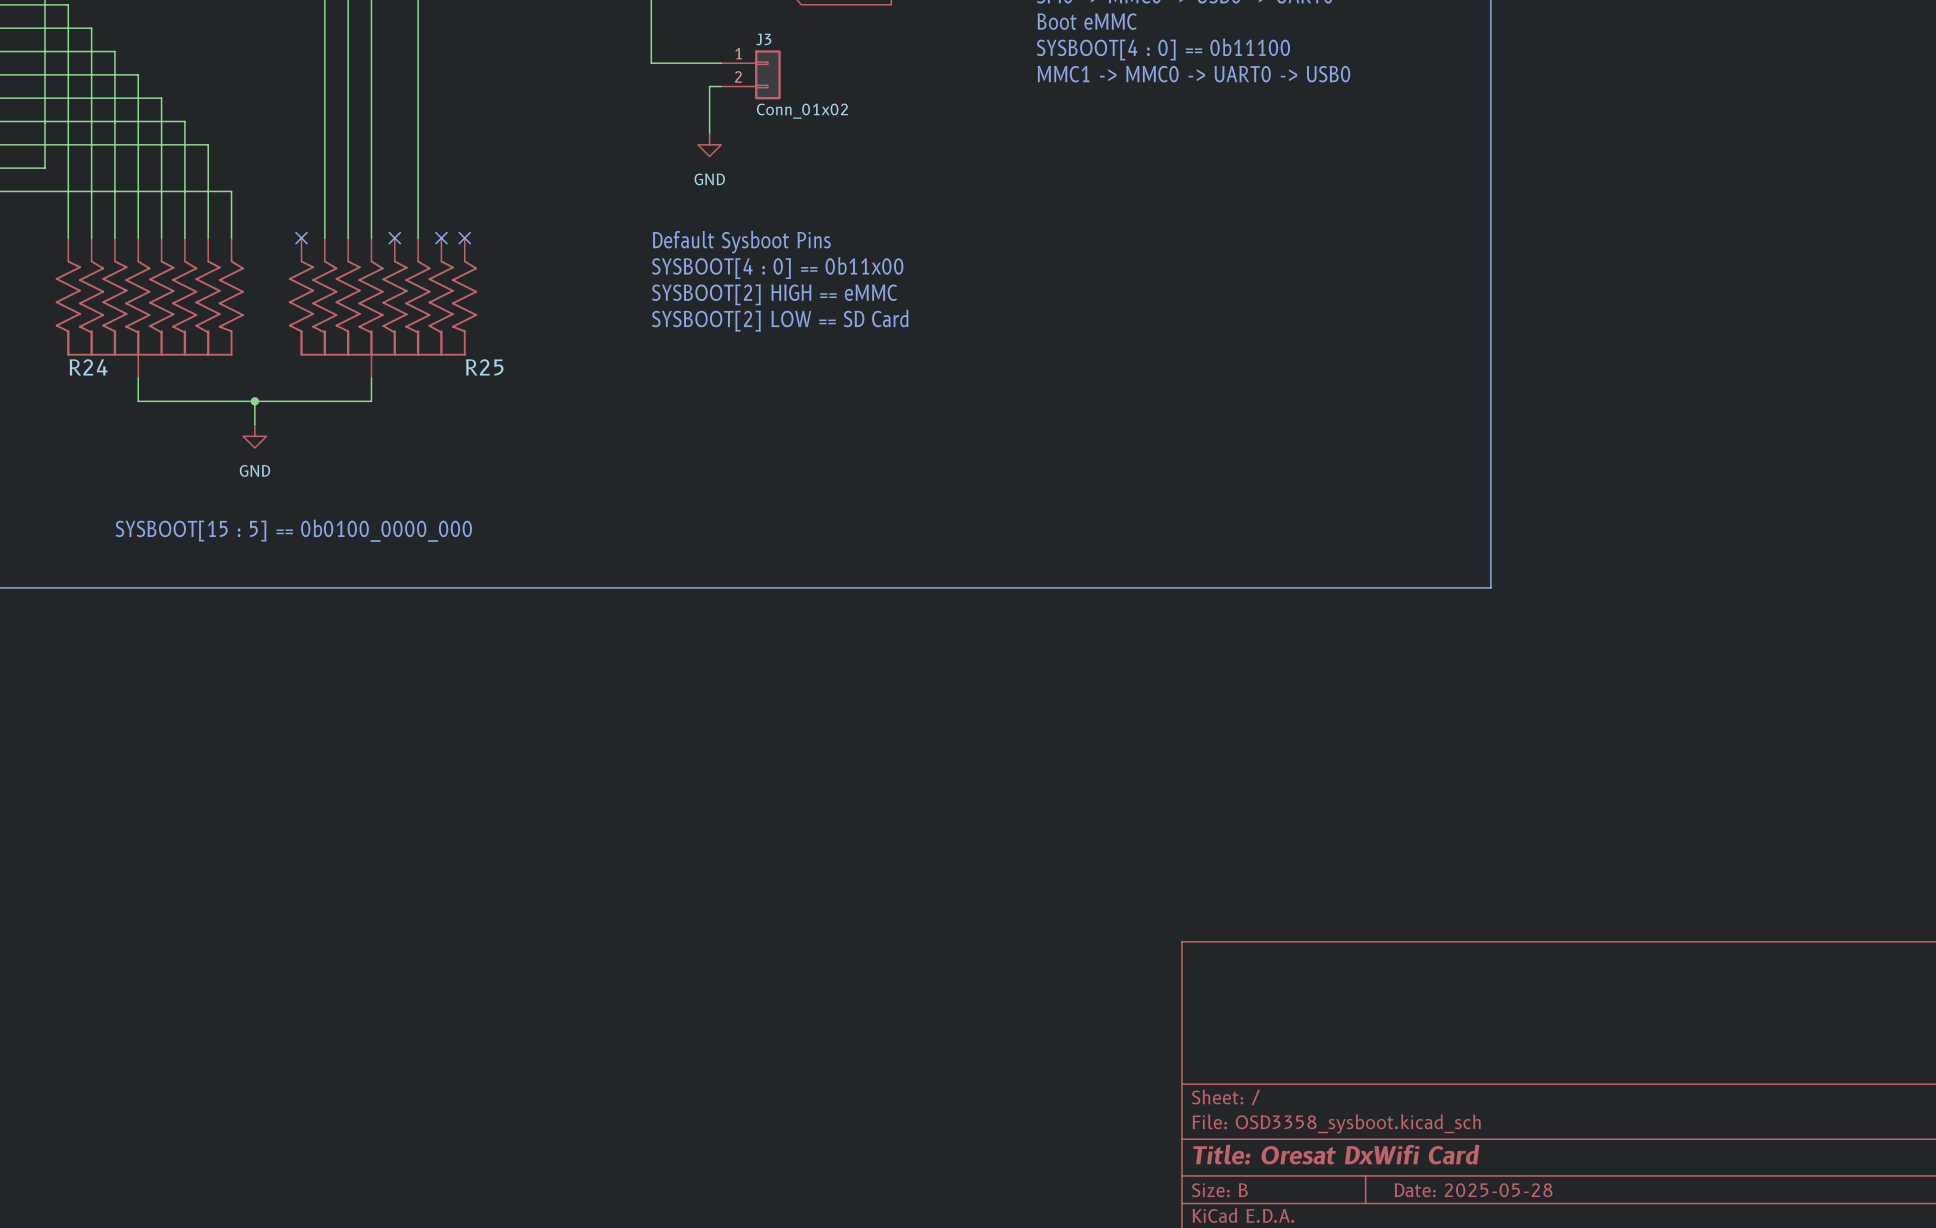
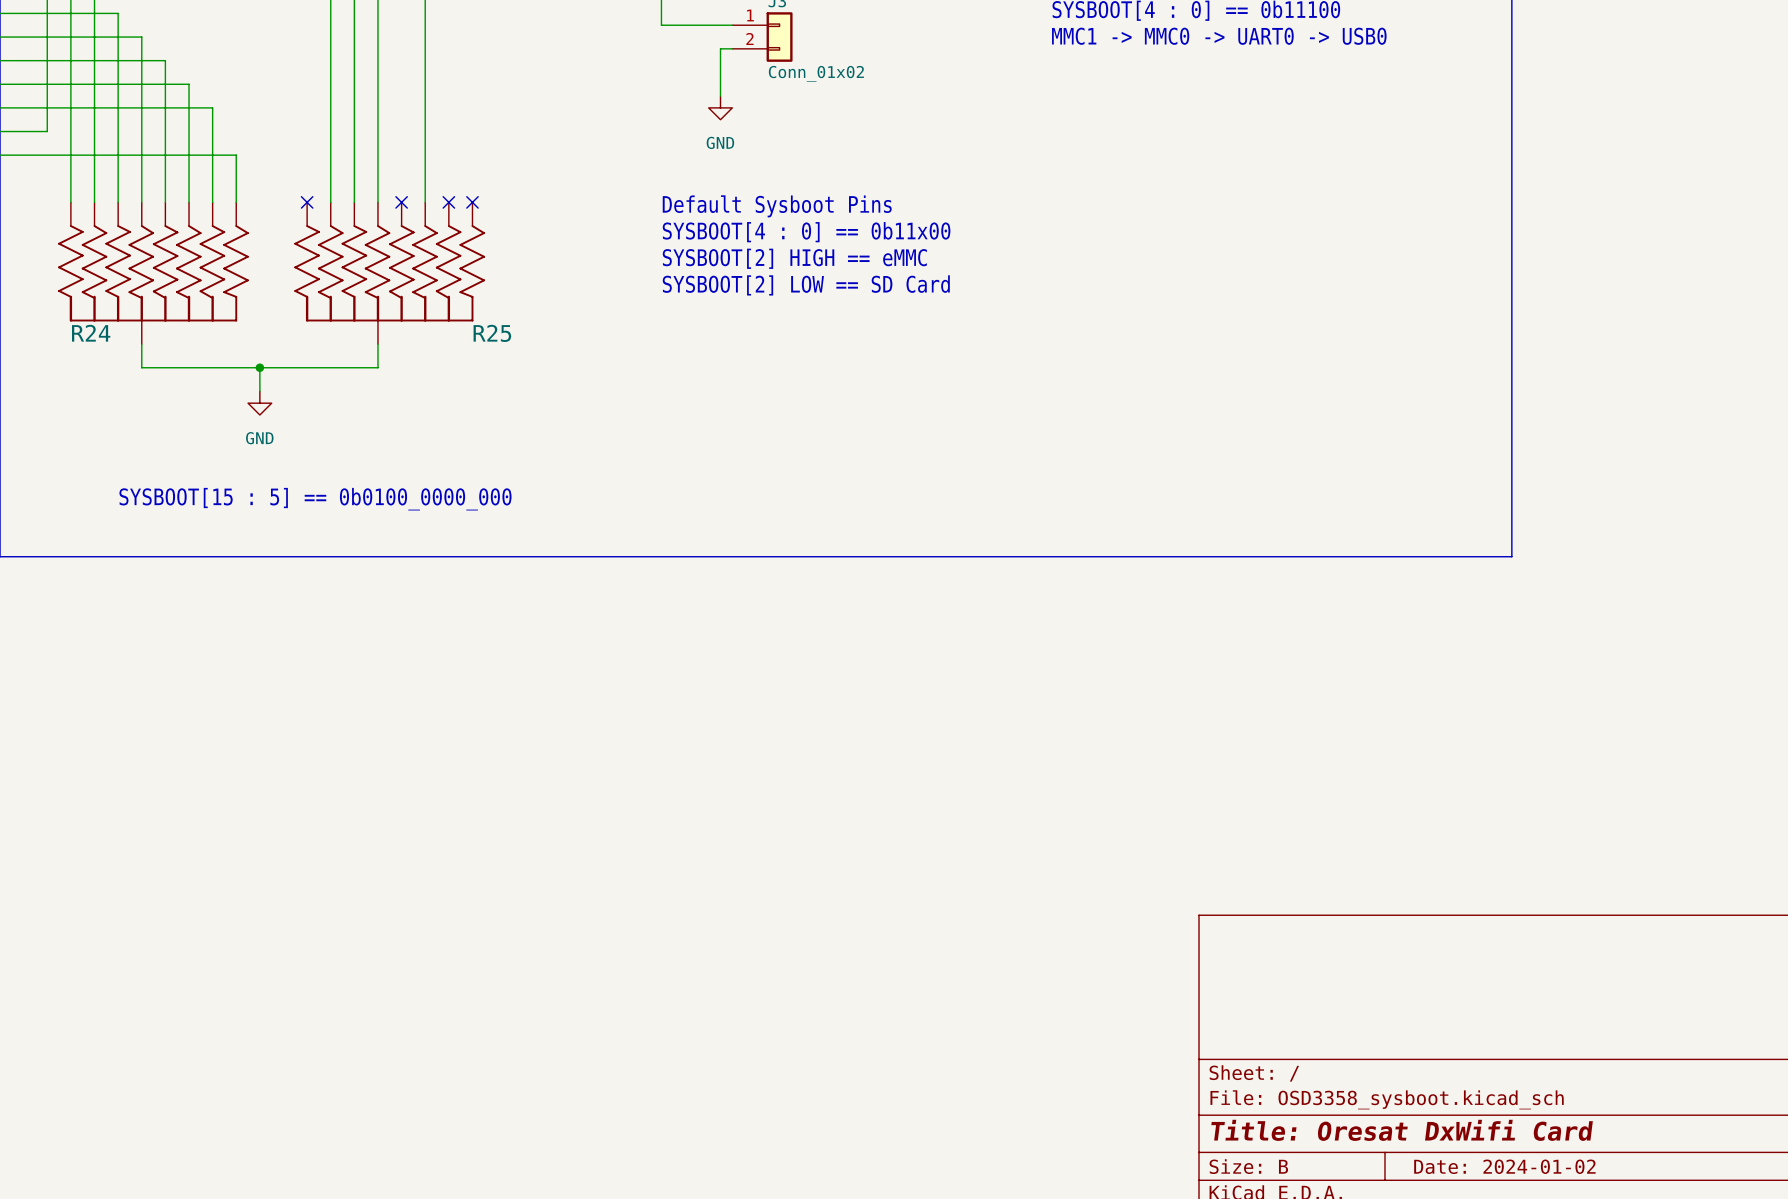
title block: Date: 2025-05-28 (1473, 1190) -> Date: 2024-01-02 (1504, 1166)

